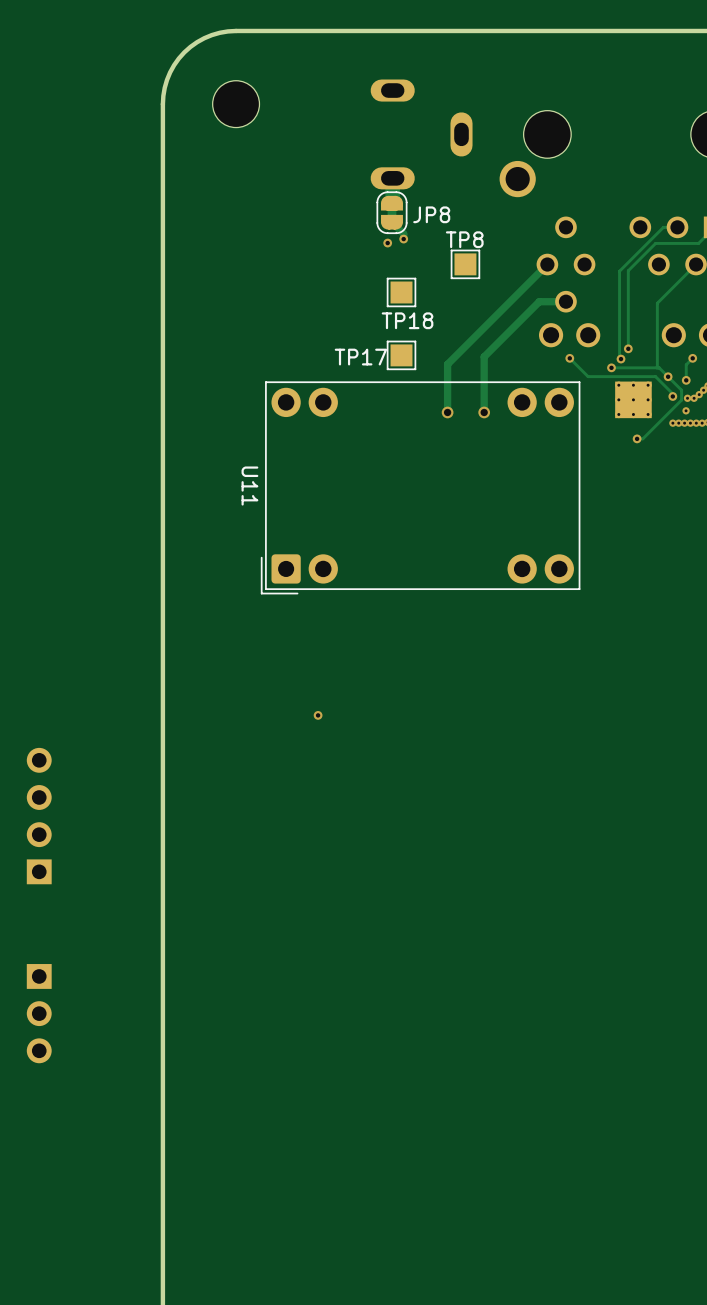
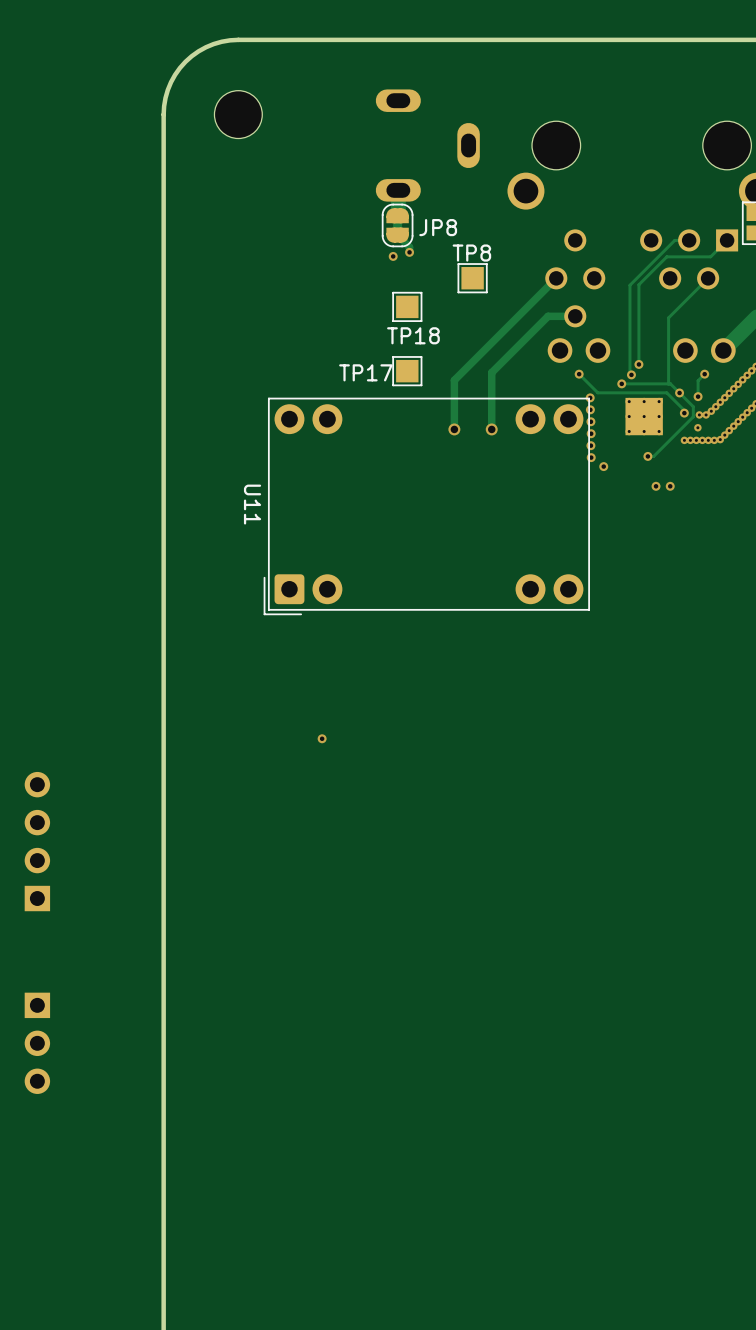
via: none -> (590, 397)
via: none -> (590, 409)
via: none -> (590, 421)
via: none -> (591, 433)
via: none -> (590, 445)
via: none -> (591, 457)
via: none -> (603, 466)
via: none -> (656, 486)
via: none -> (670, 486)

